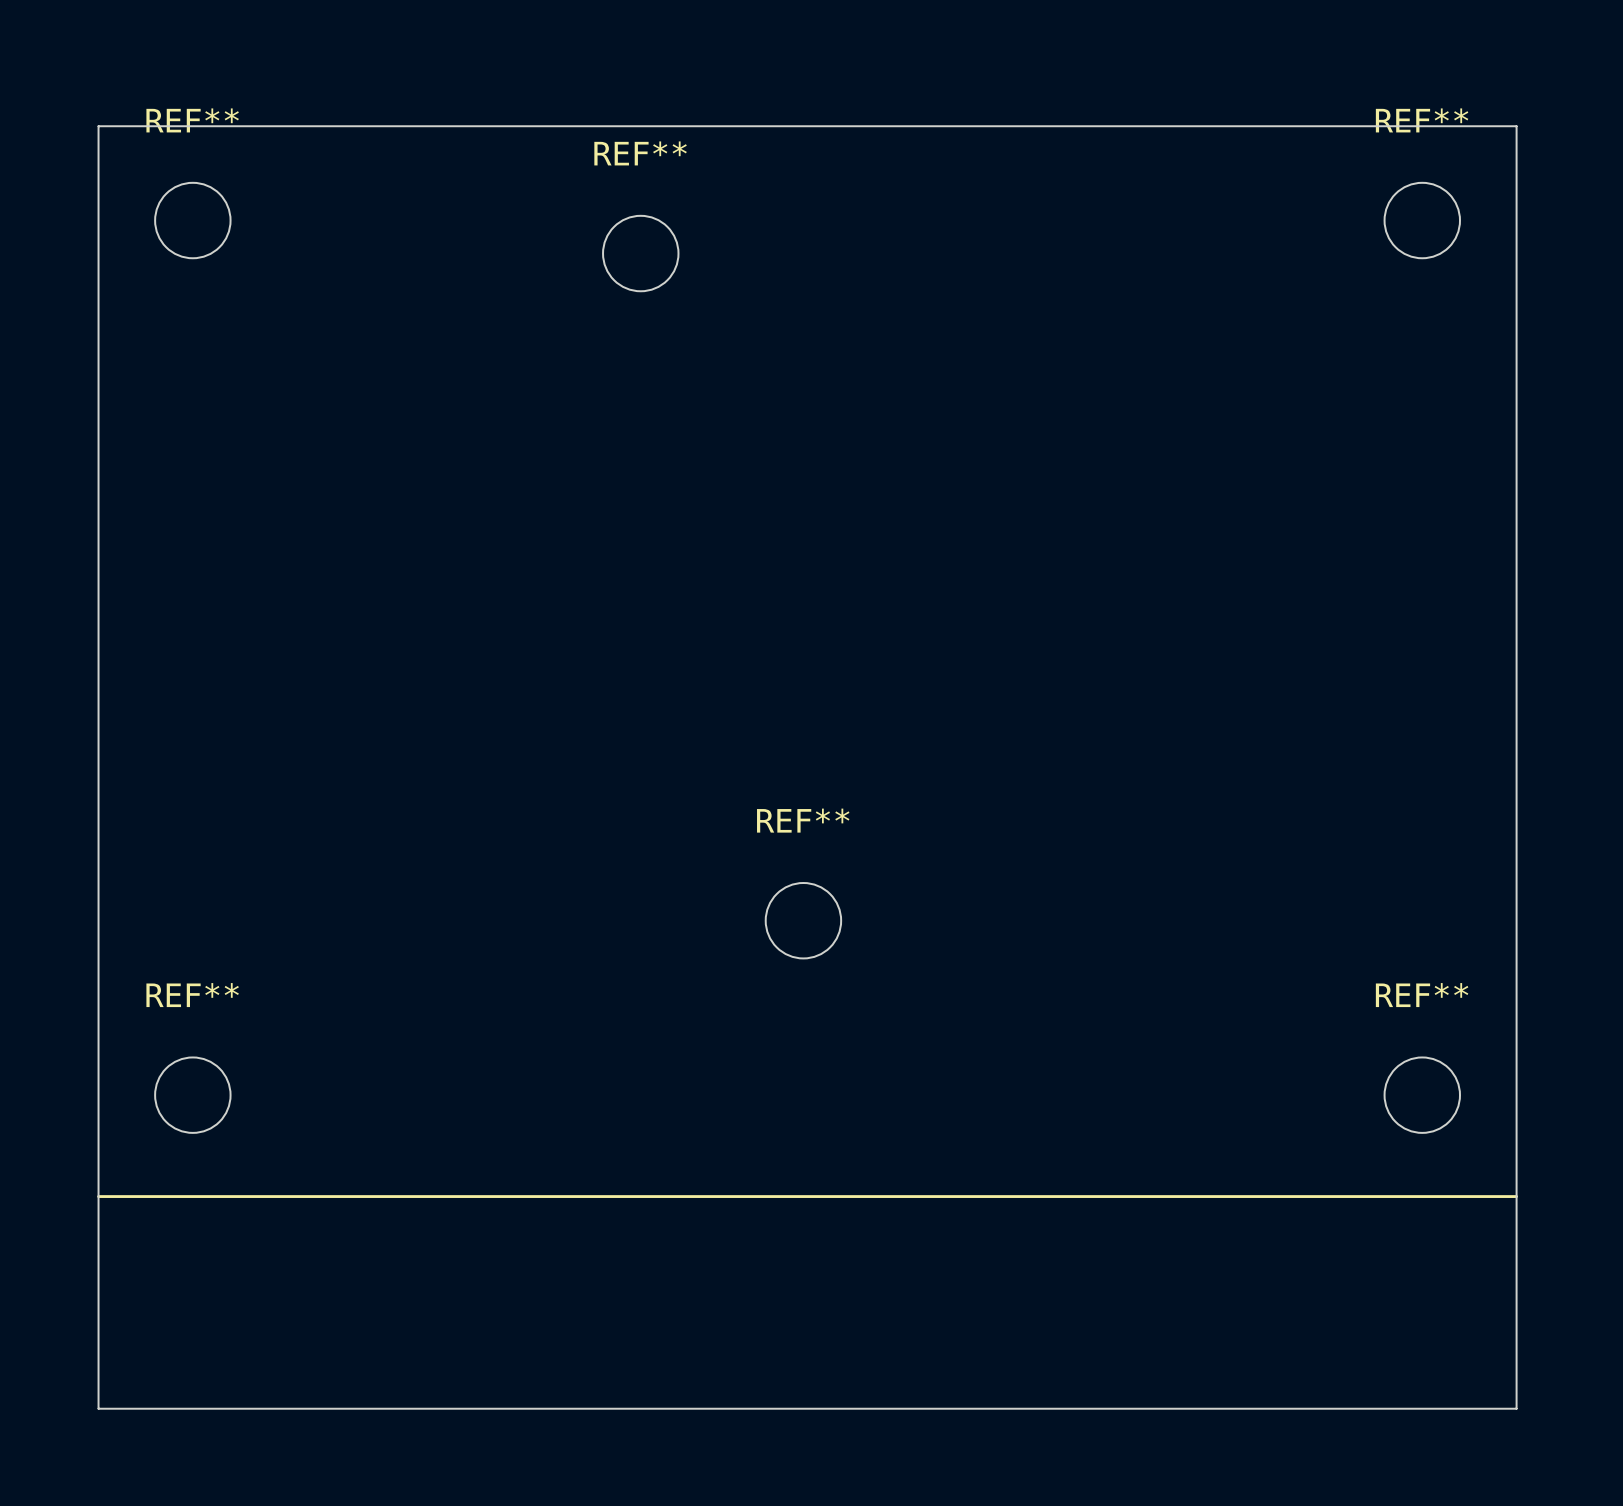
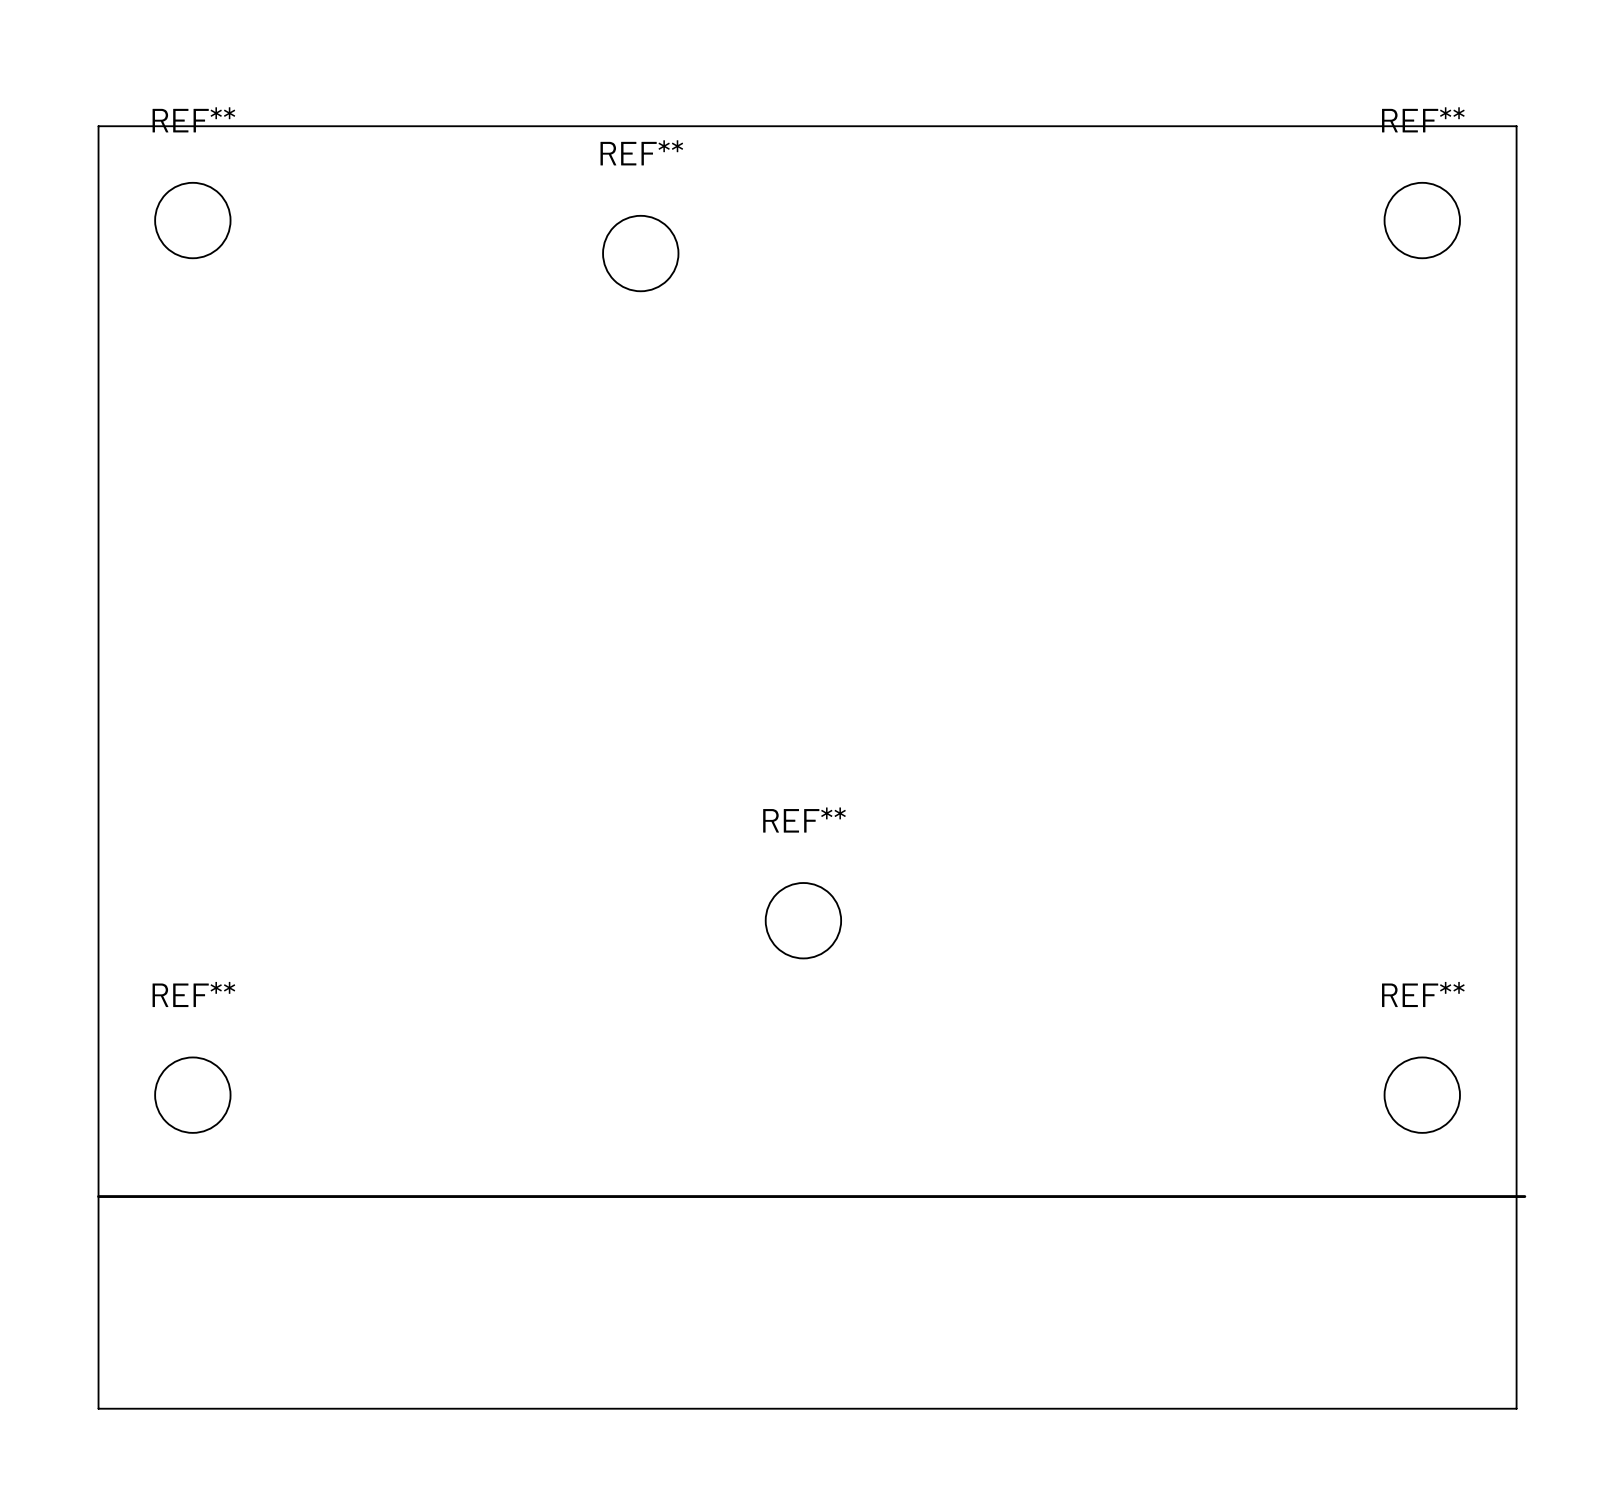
line: none -> (1516, 1196) (1524, 1196)

